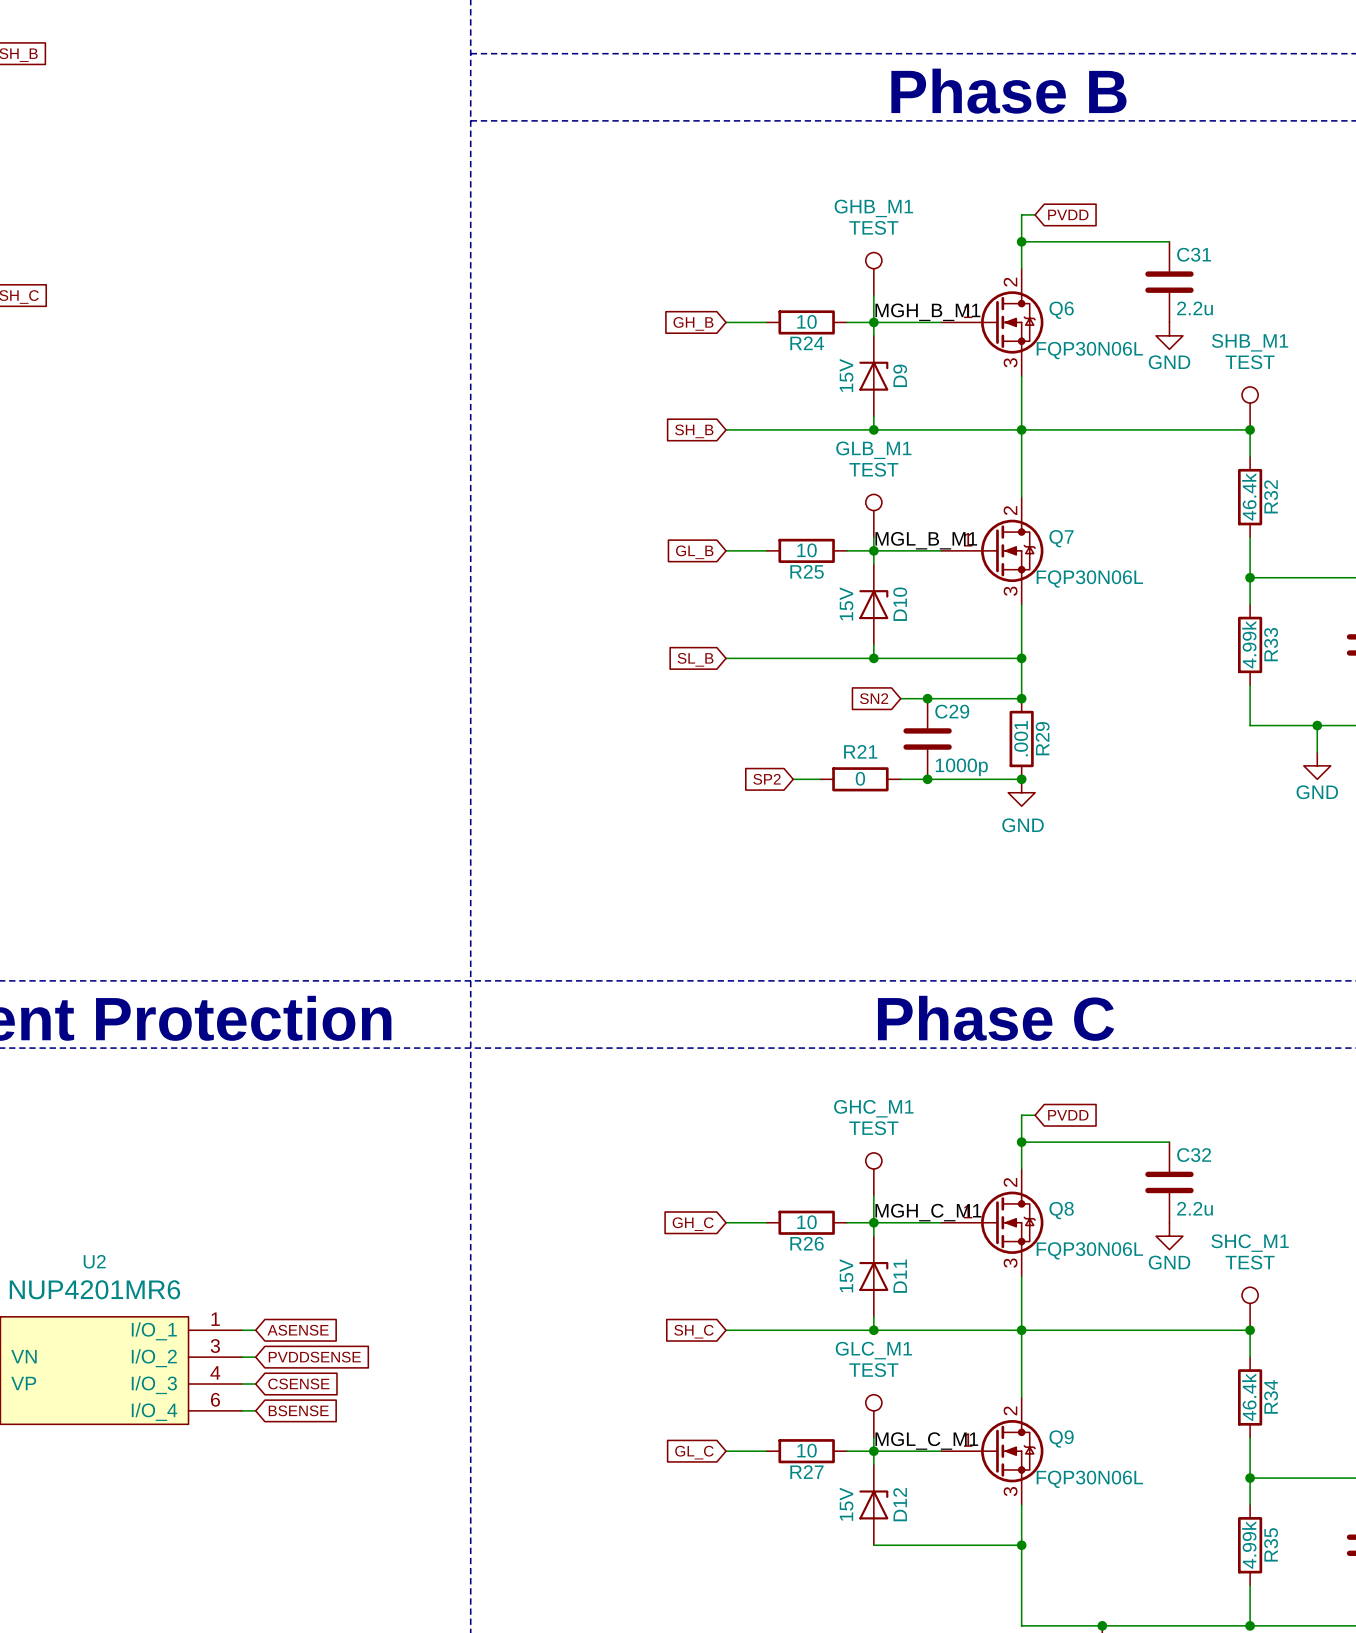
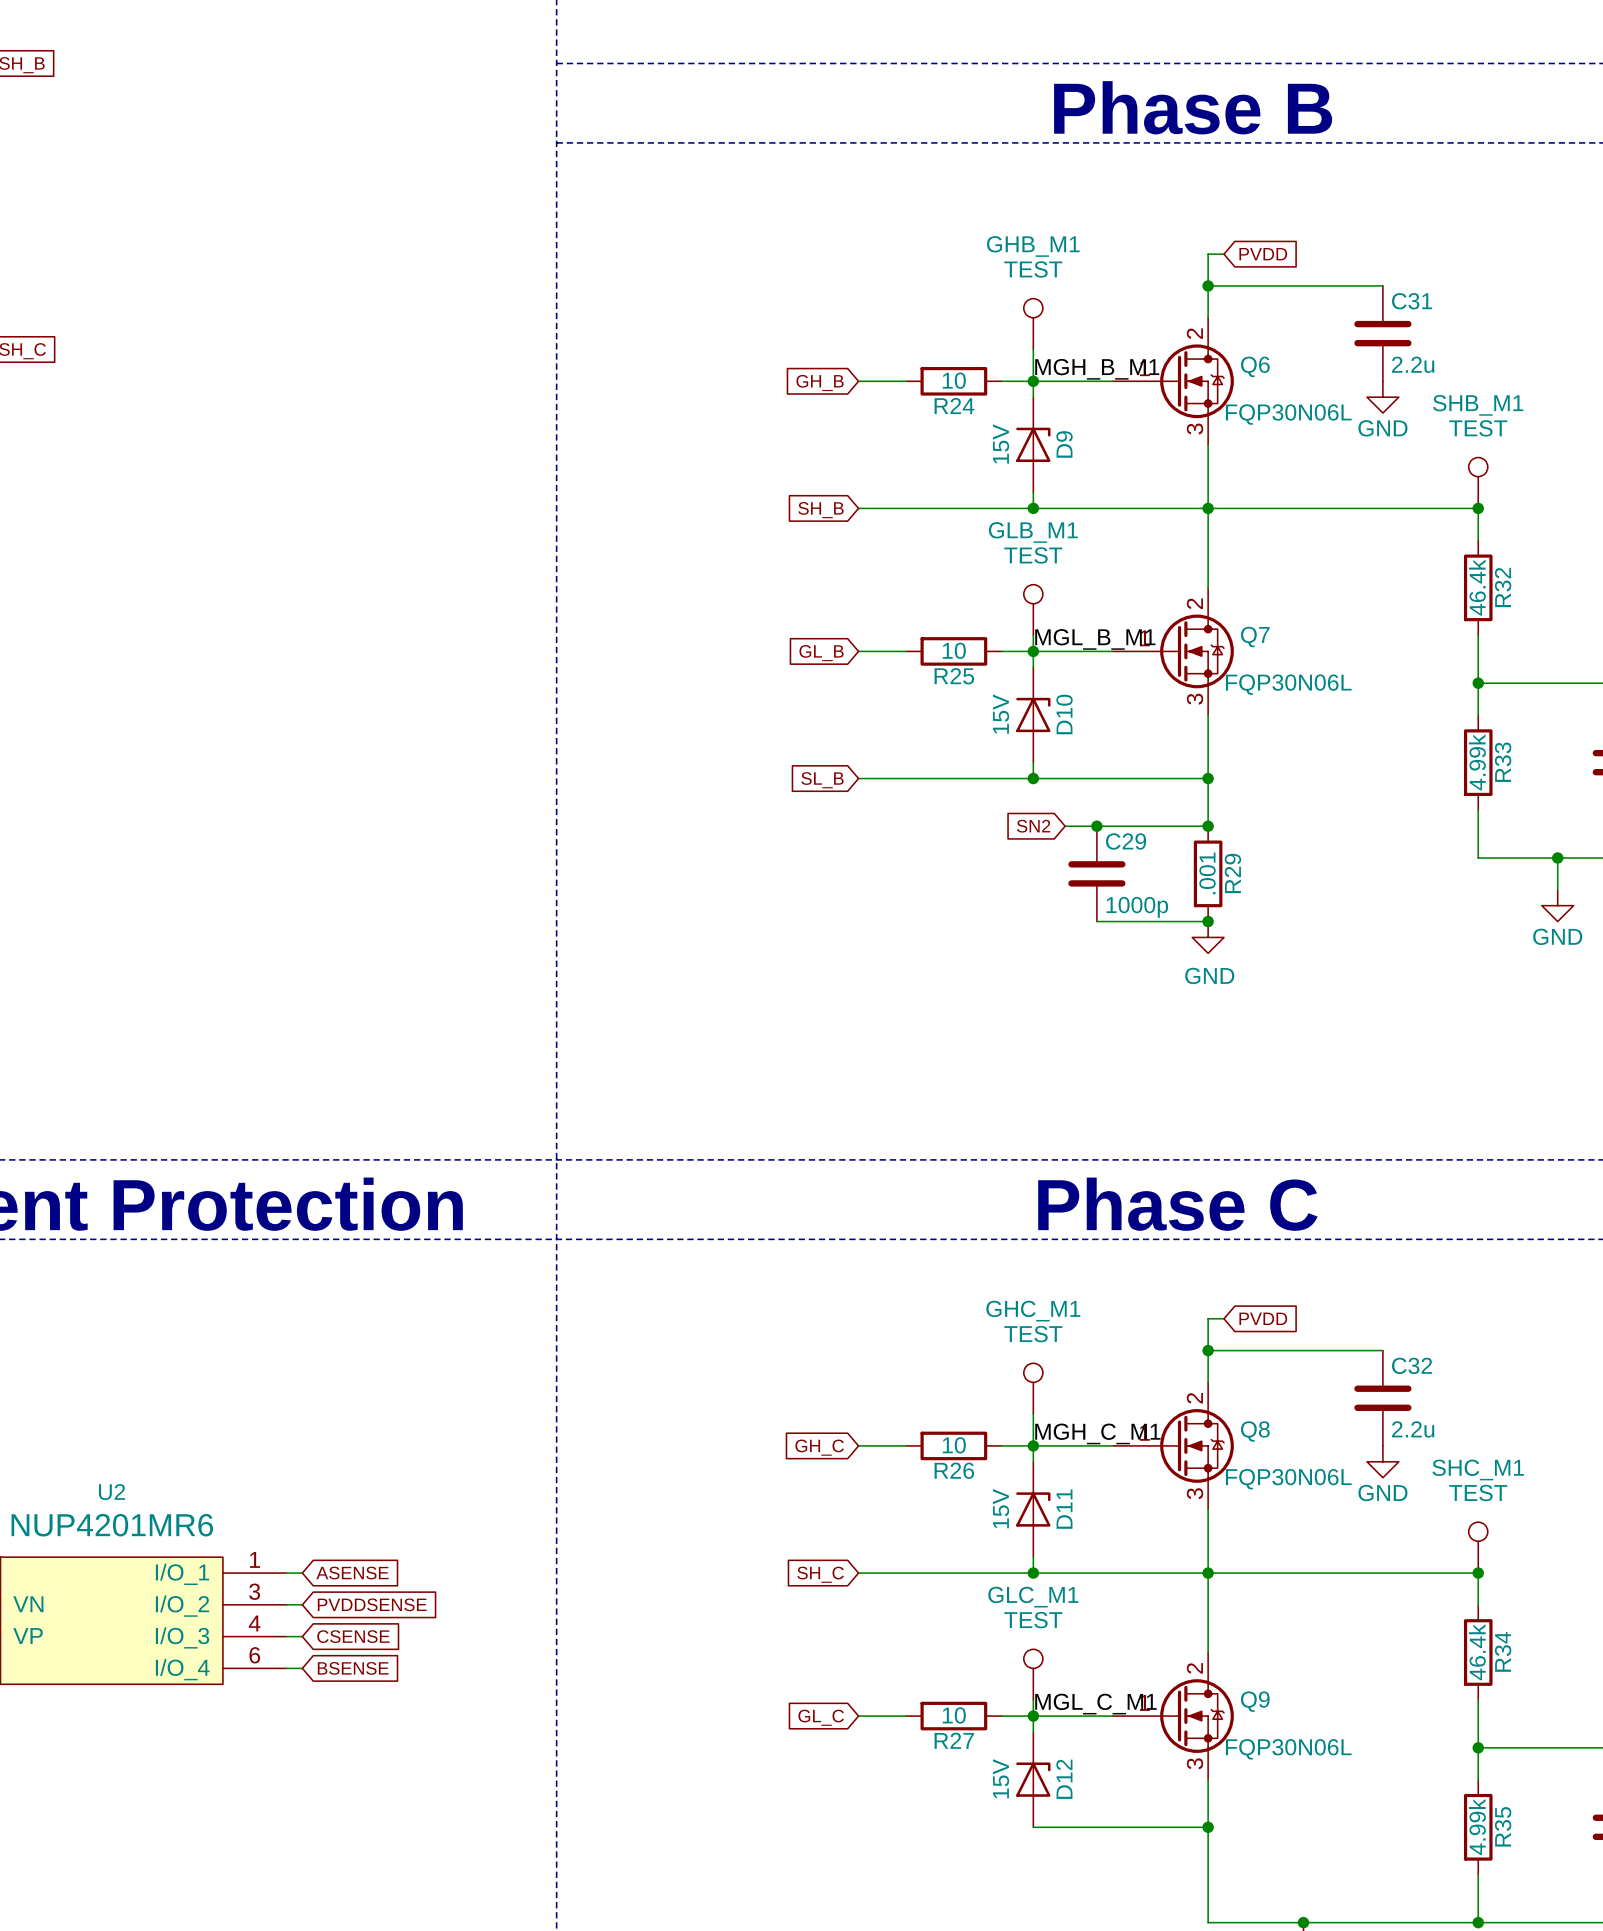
global label: SP2 (766, 779) -> none
wire: (793, 779) (820, 779) -> none
R21: 0 (860, 779) -> none
wire: (900, 779) (927, 779) -> none
junction: (927, 779) -> none

